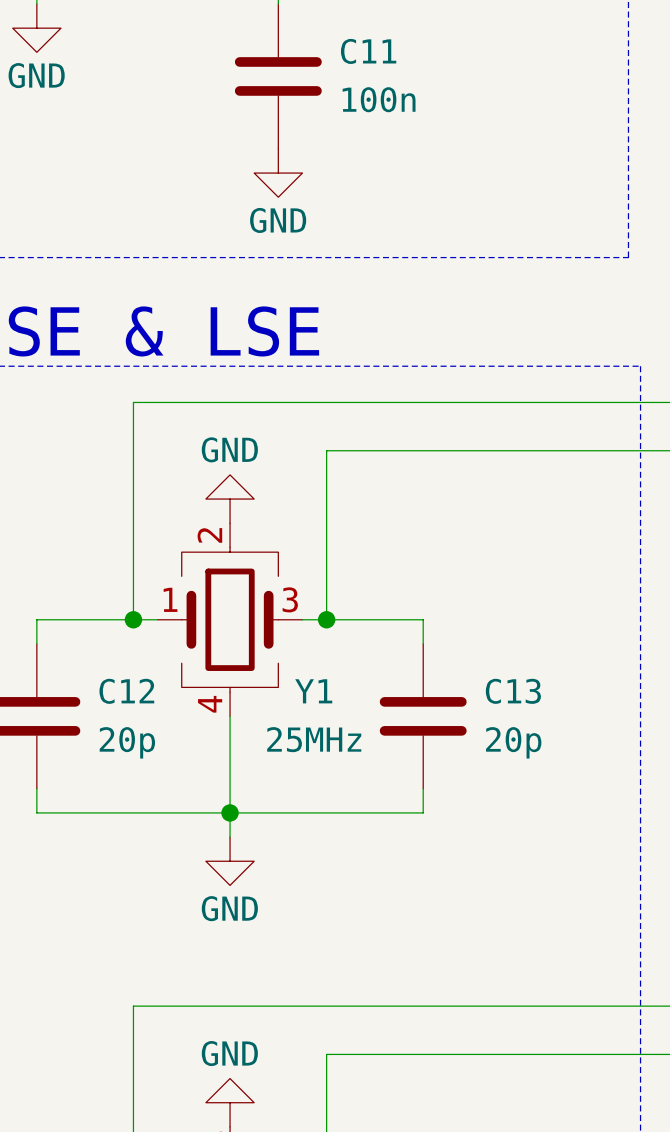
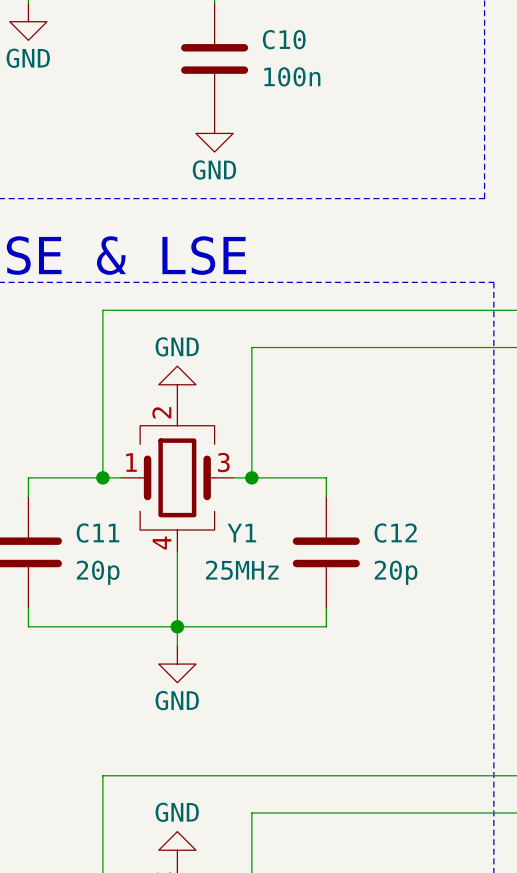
C11 name: C11 (368, 51) -> C10 (284, 39)
C12 name: C12 (126, 691) -> C11 (98, 533)
C13 name: C13 (513, 691) -> C12 (395, 533)

